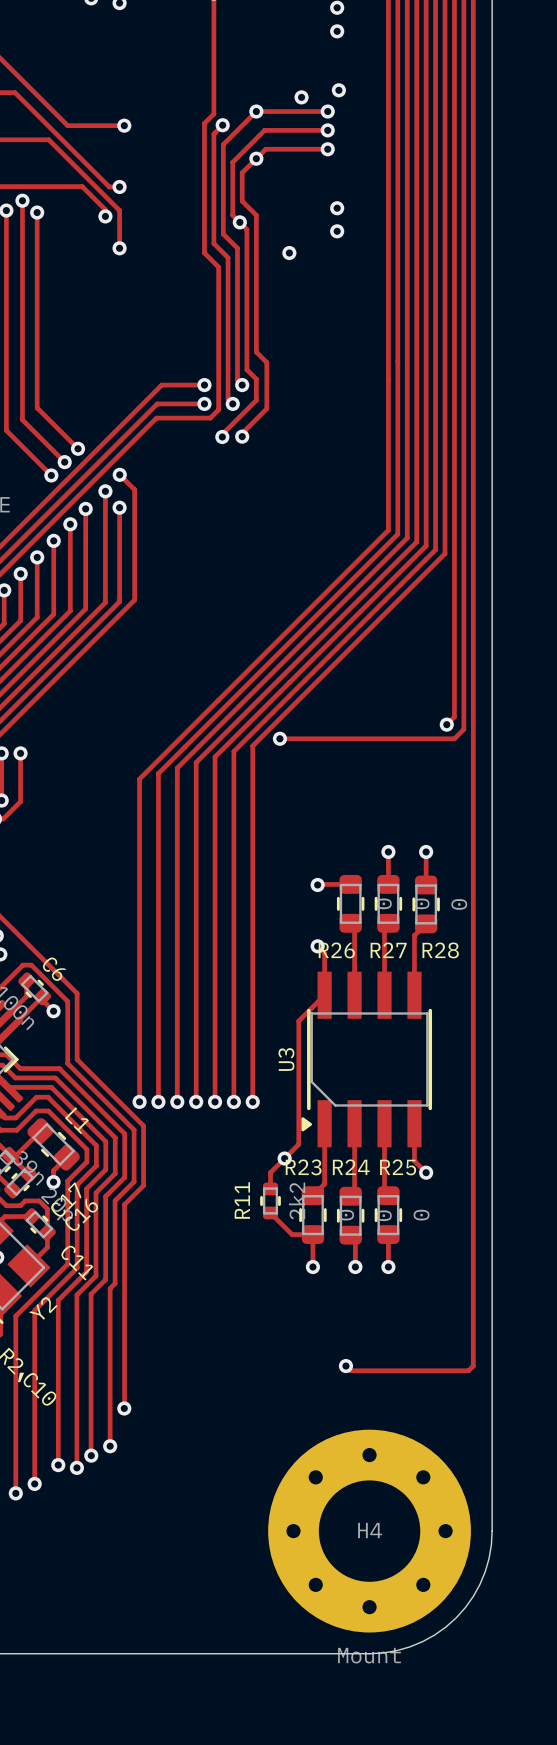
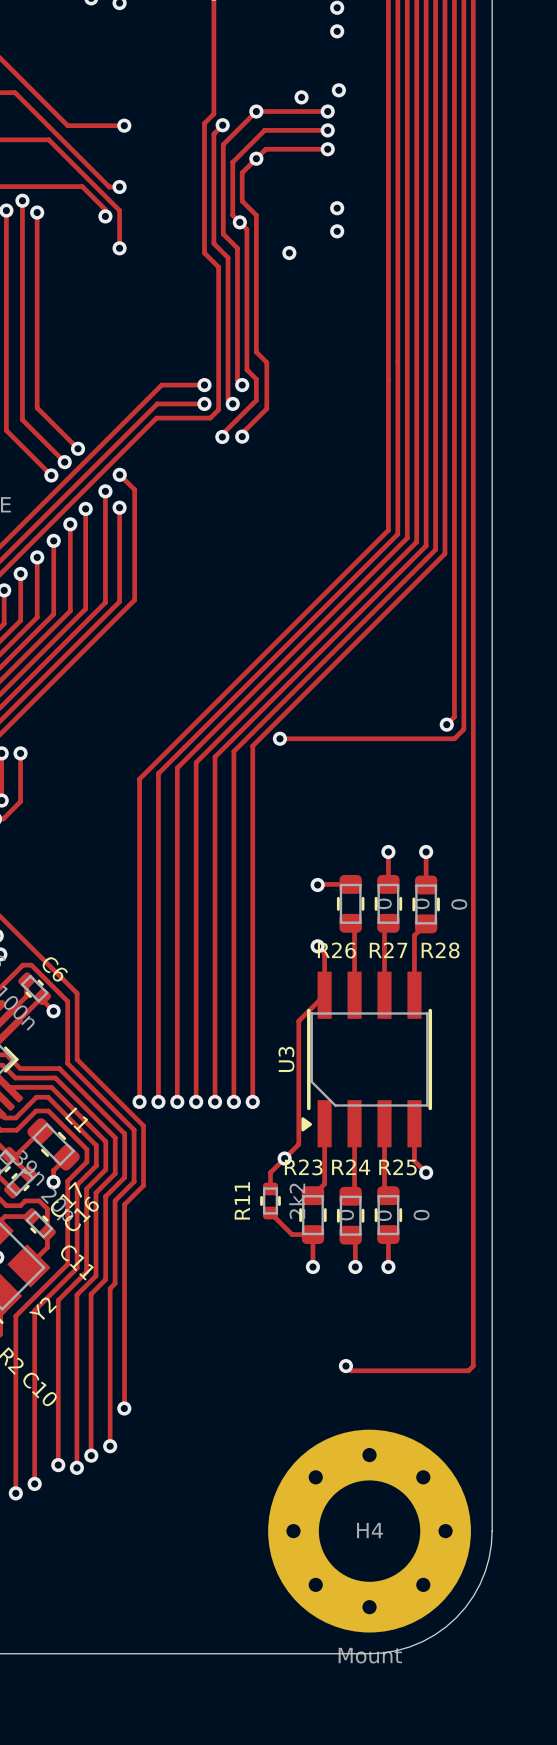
text: , (21, 1377) -> none

